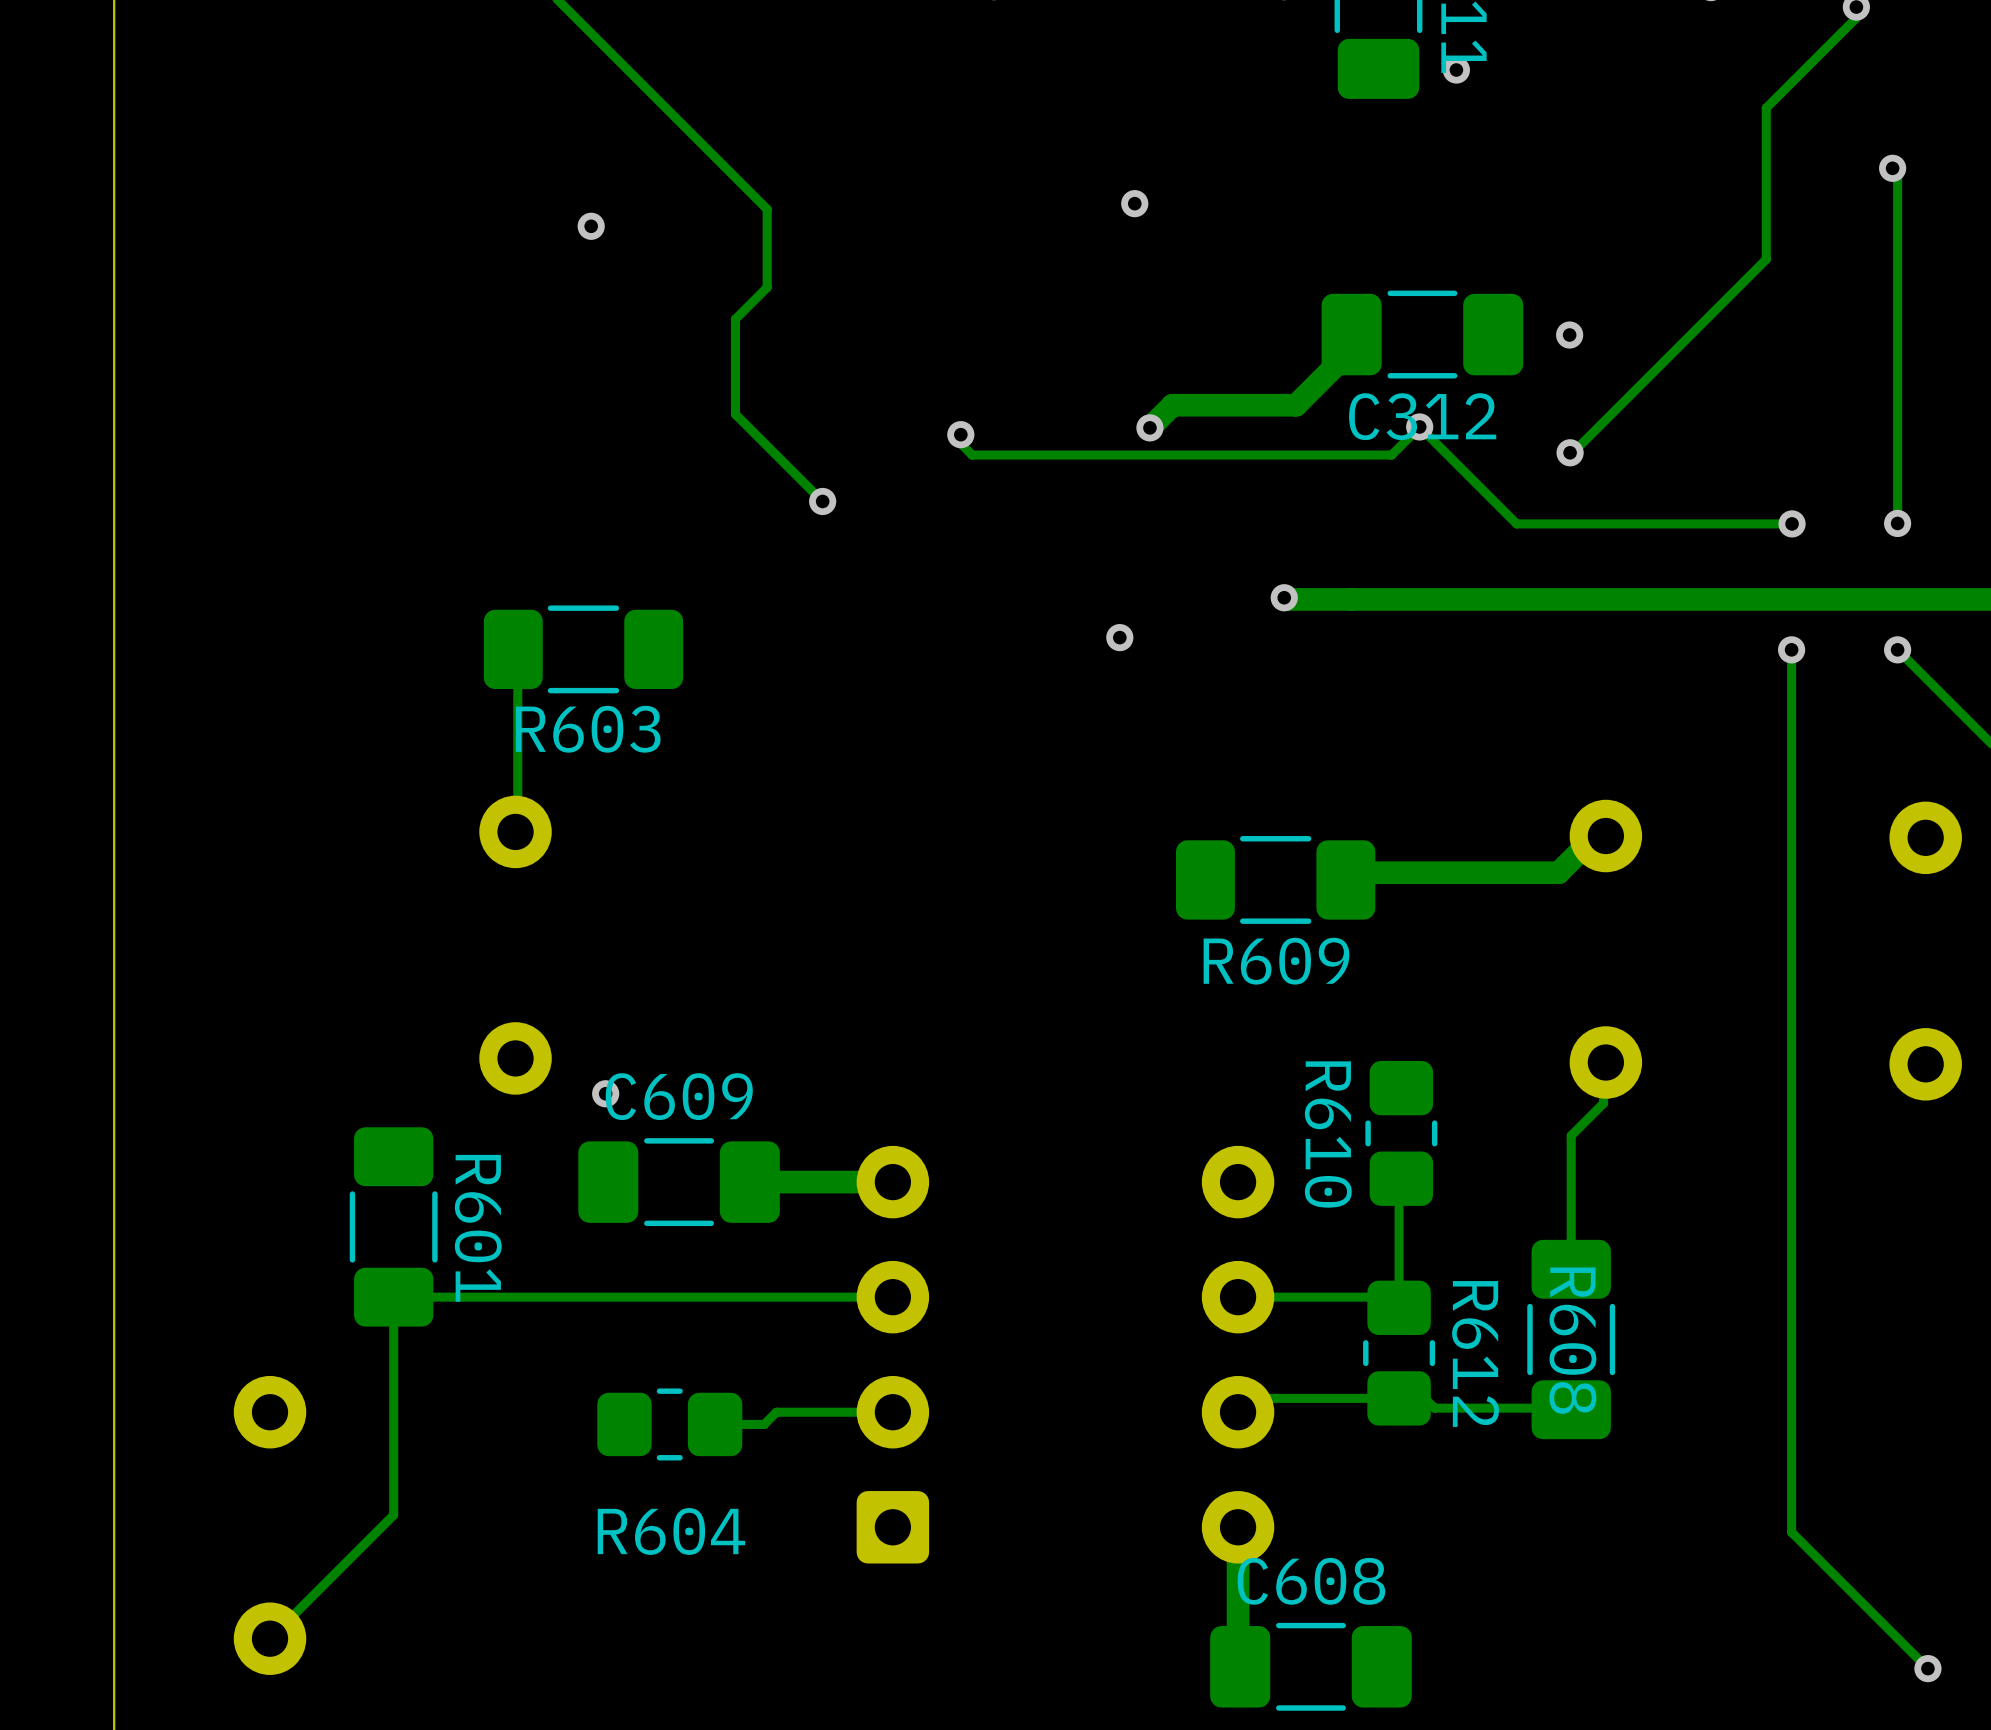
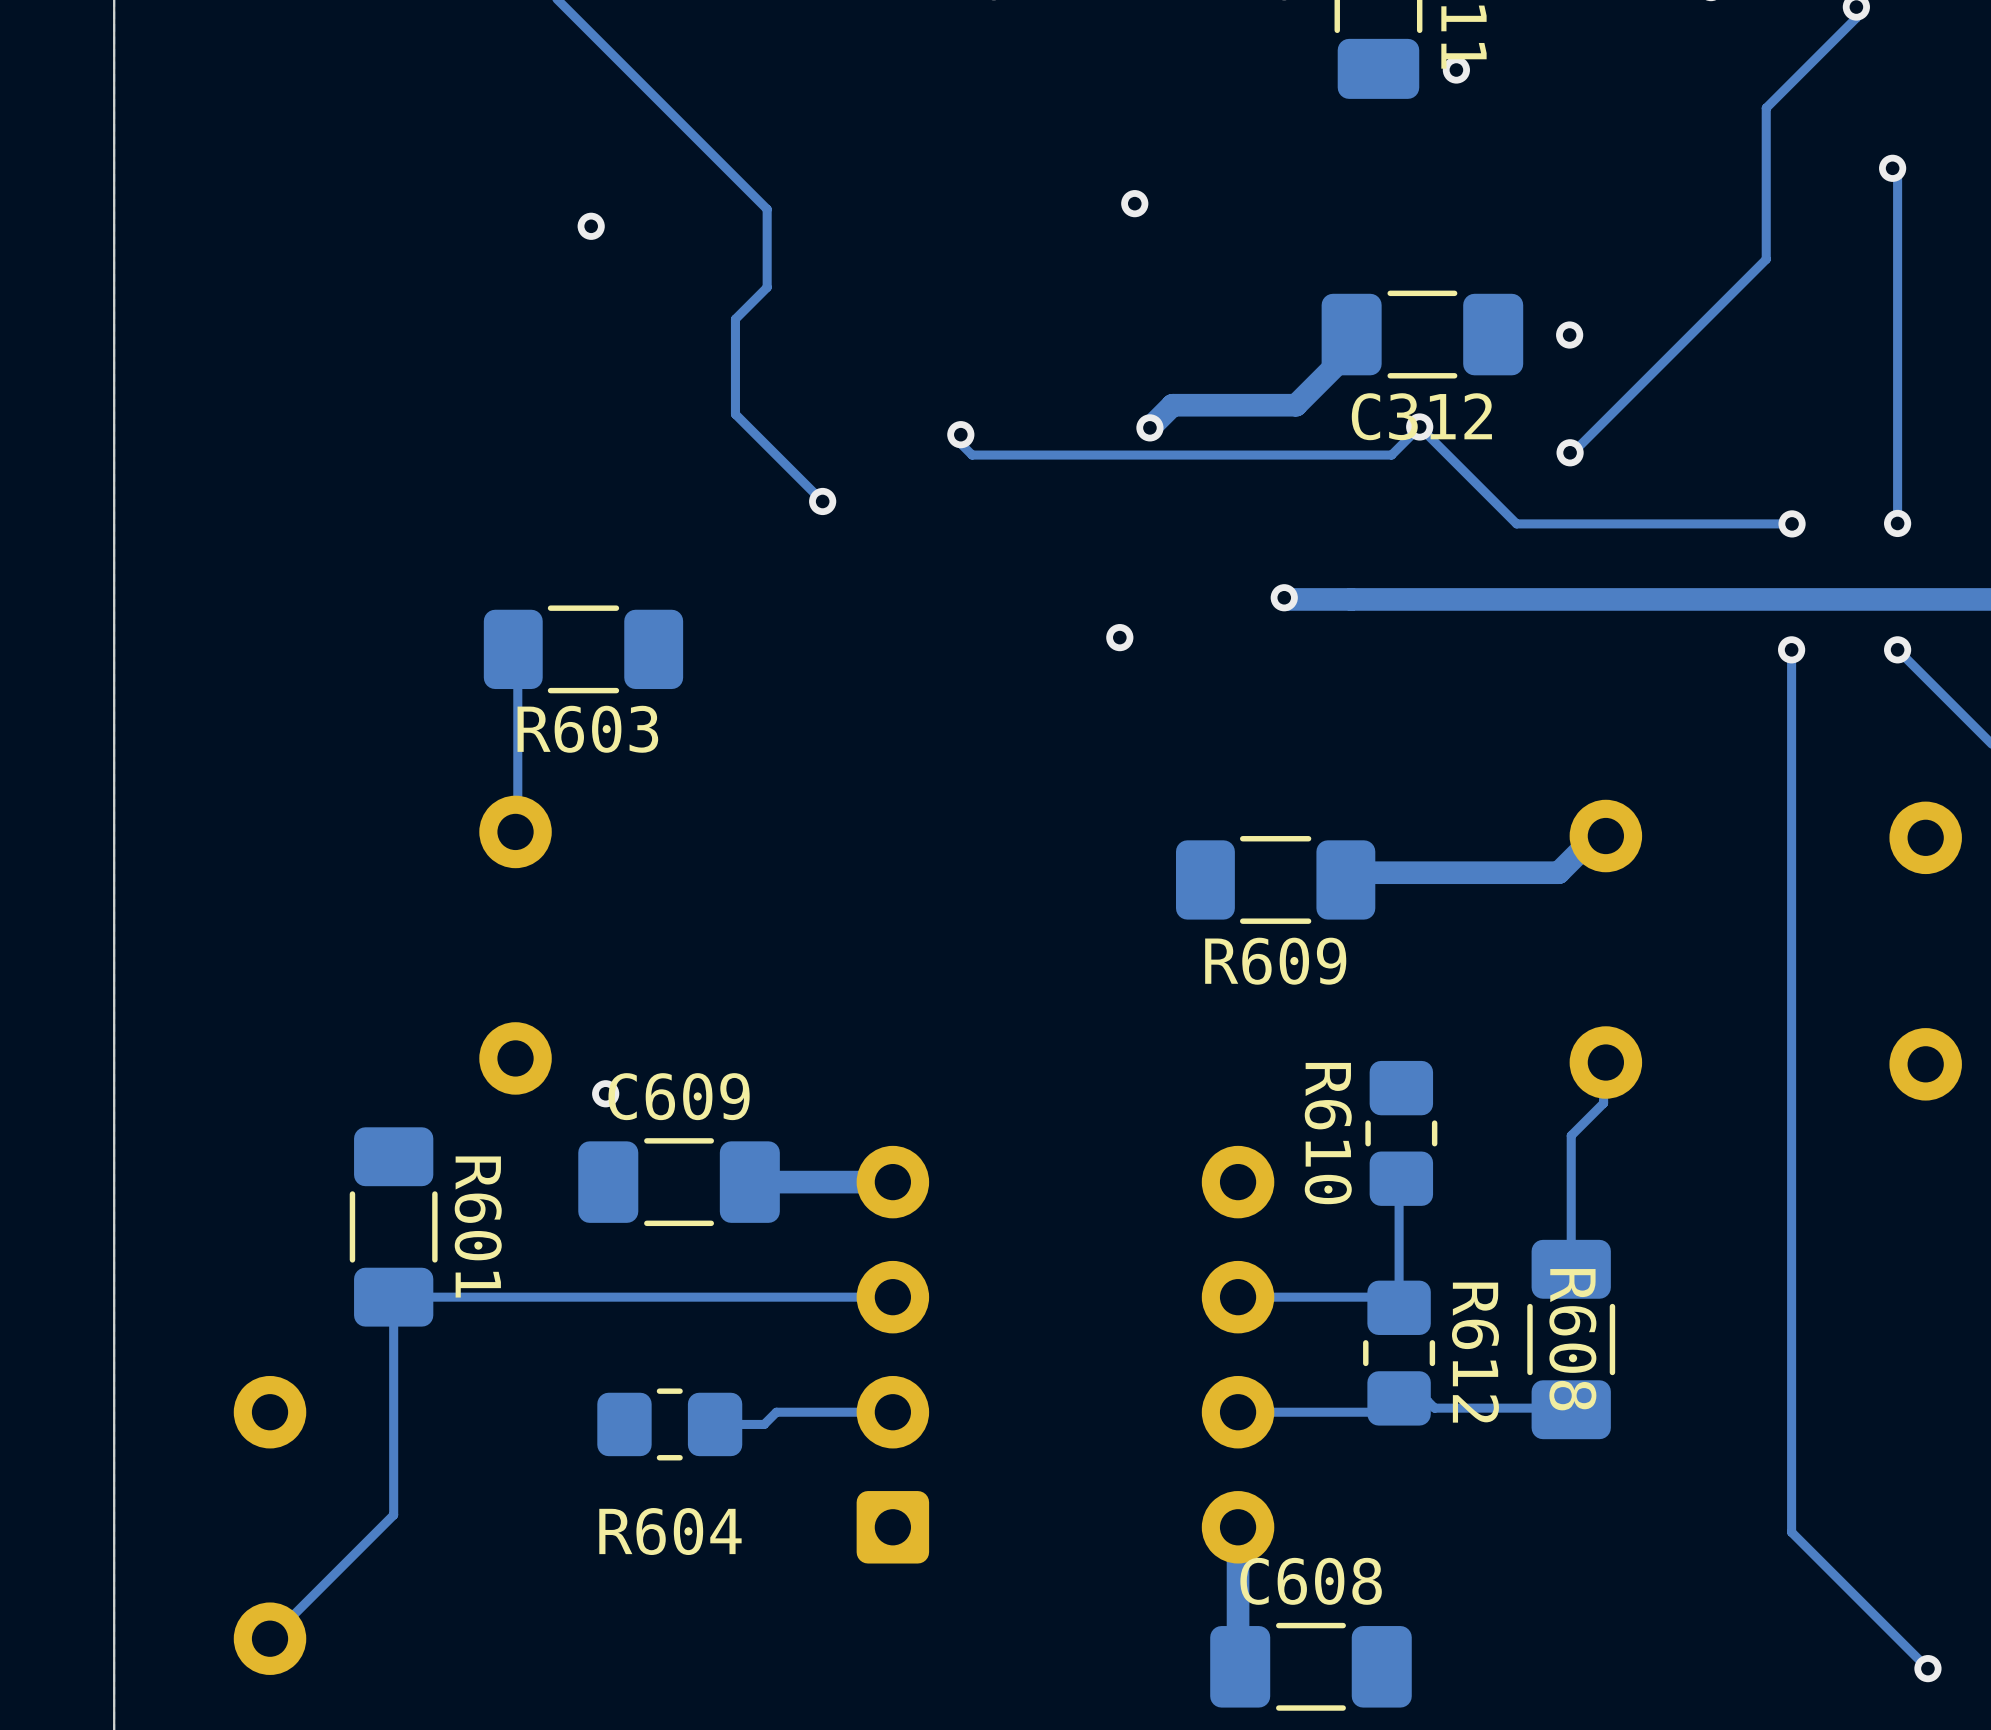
track: (1427, 1401) (1424, 1398) (1251, 1398) (1238, 1412) -> (1427, 1401) (1424, 1401) (1413, 1412) (1238, 1412)

